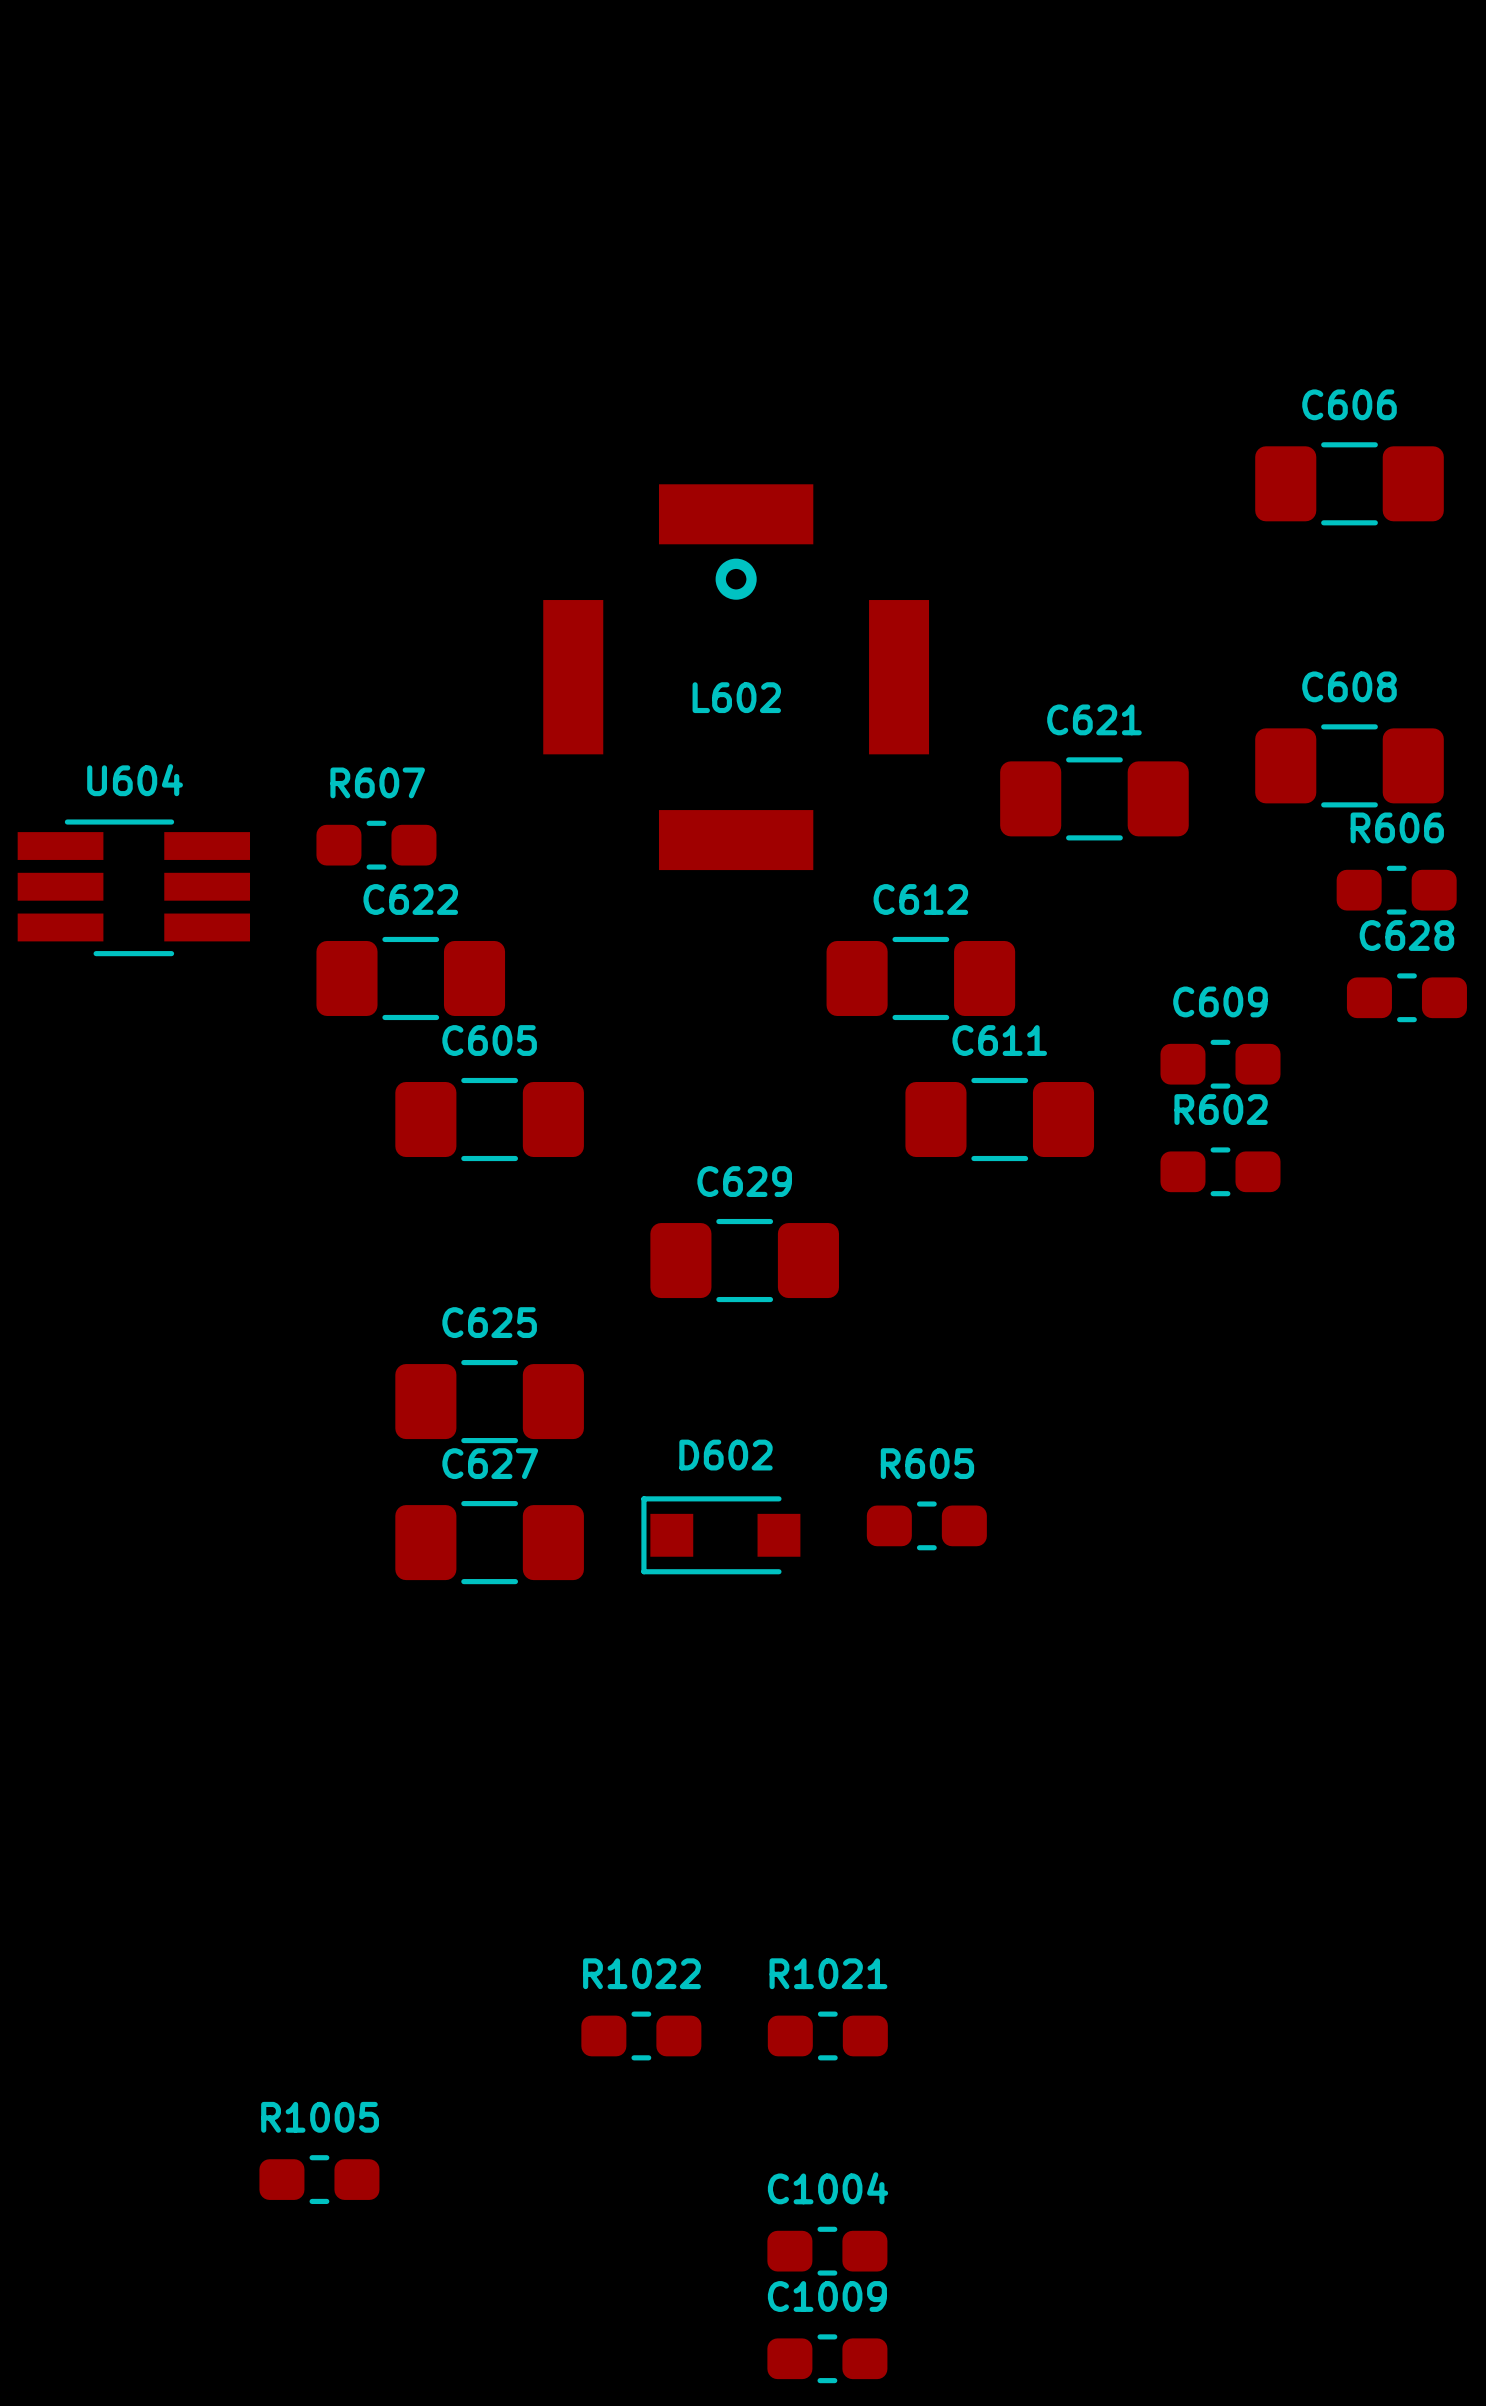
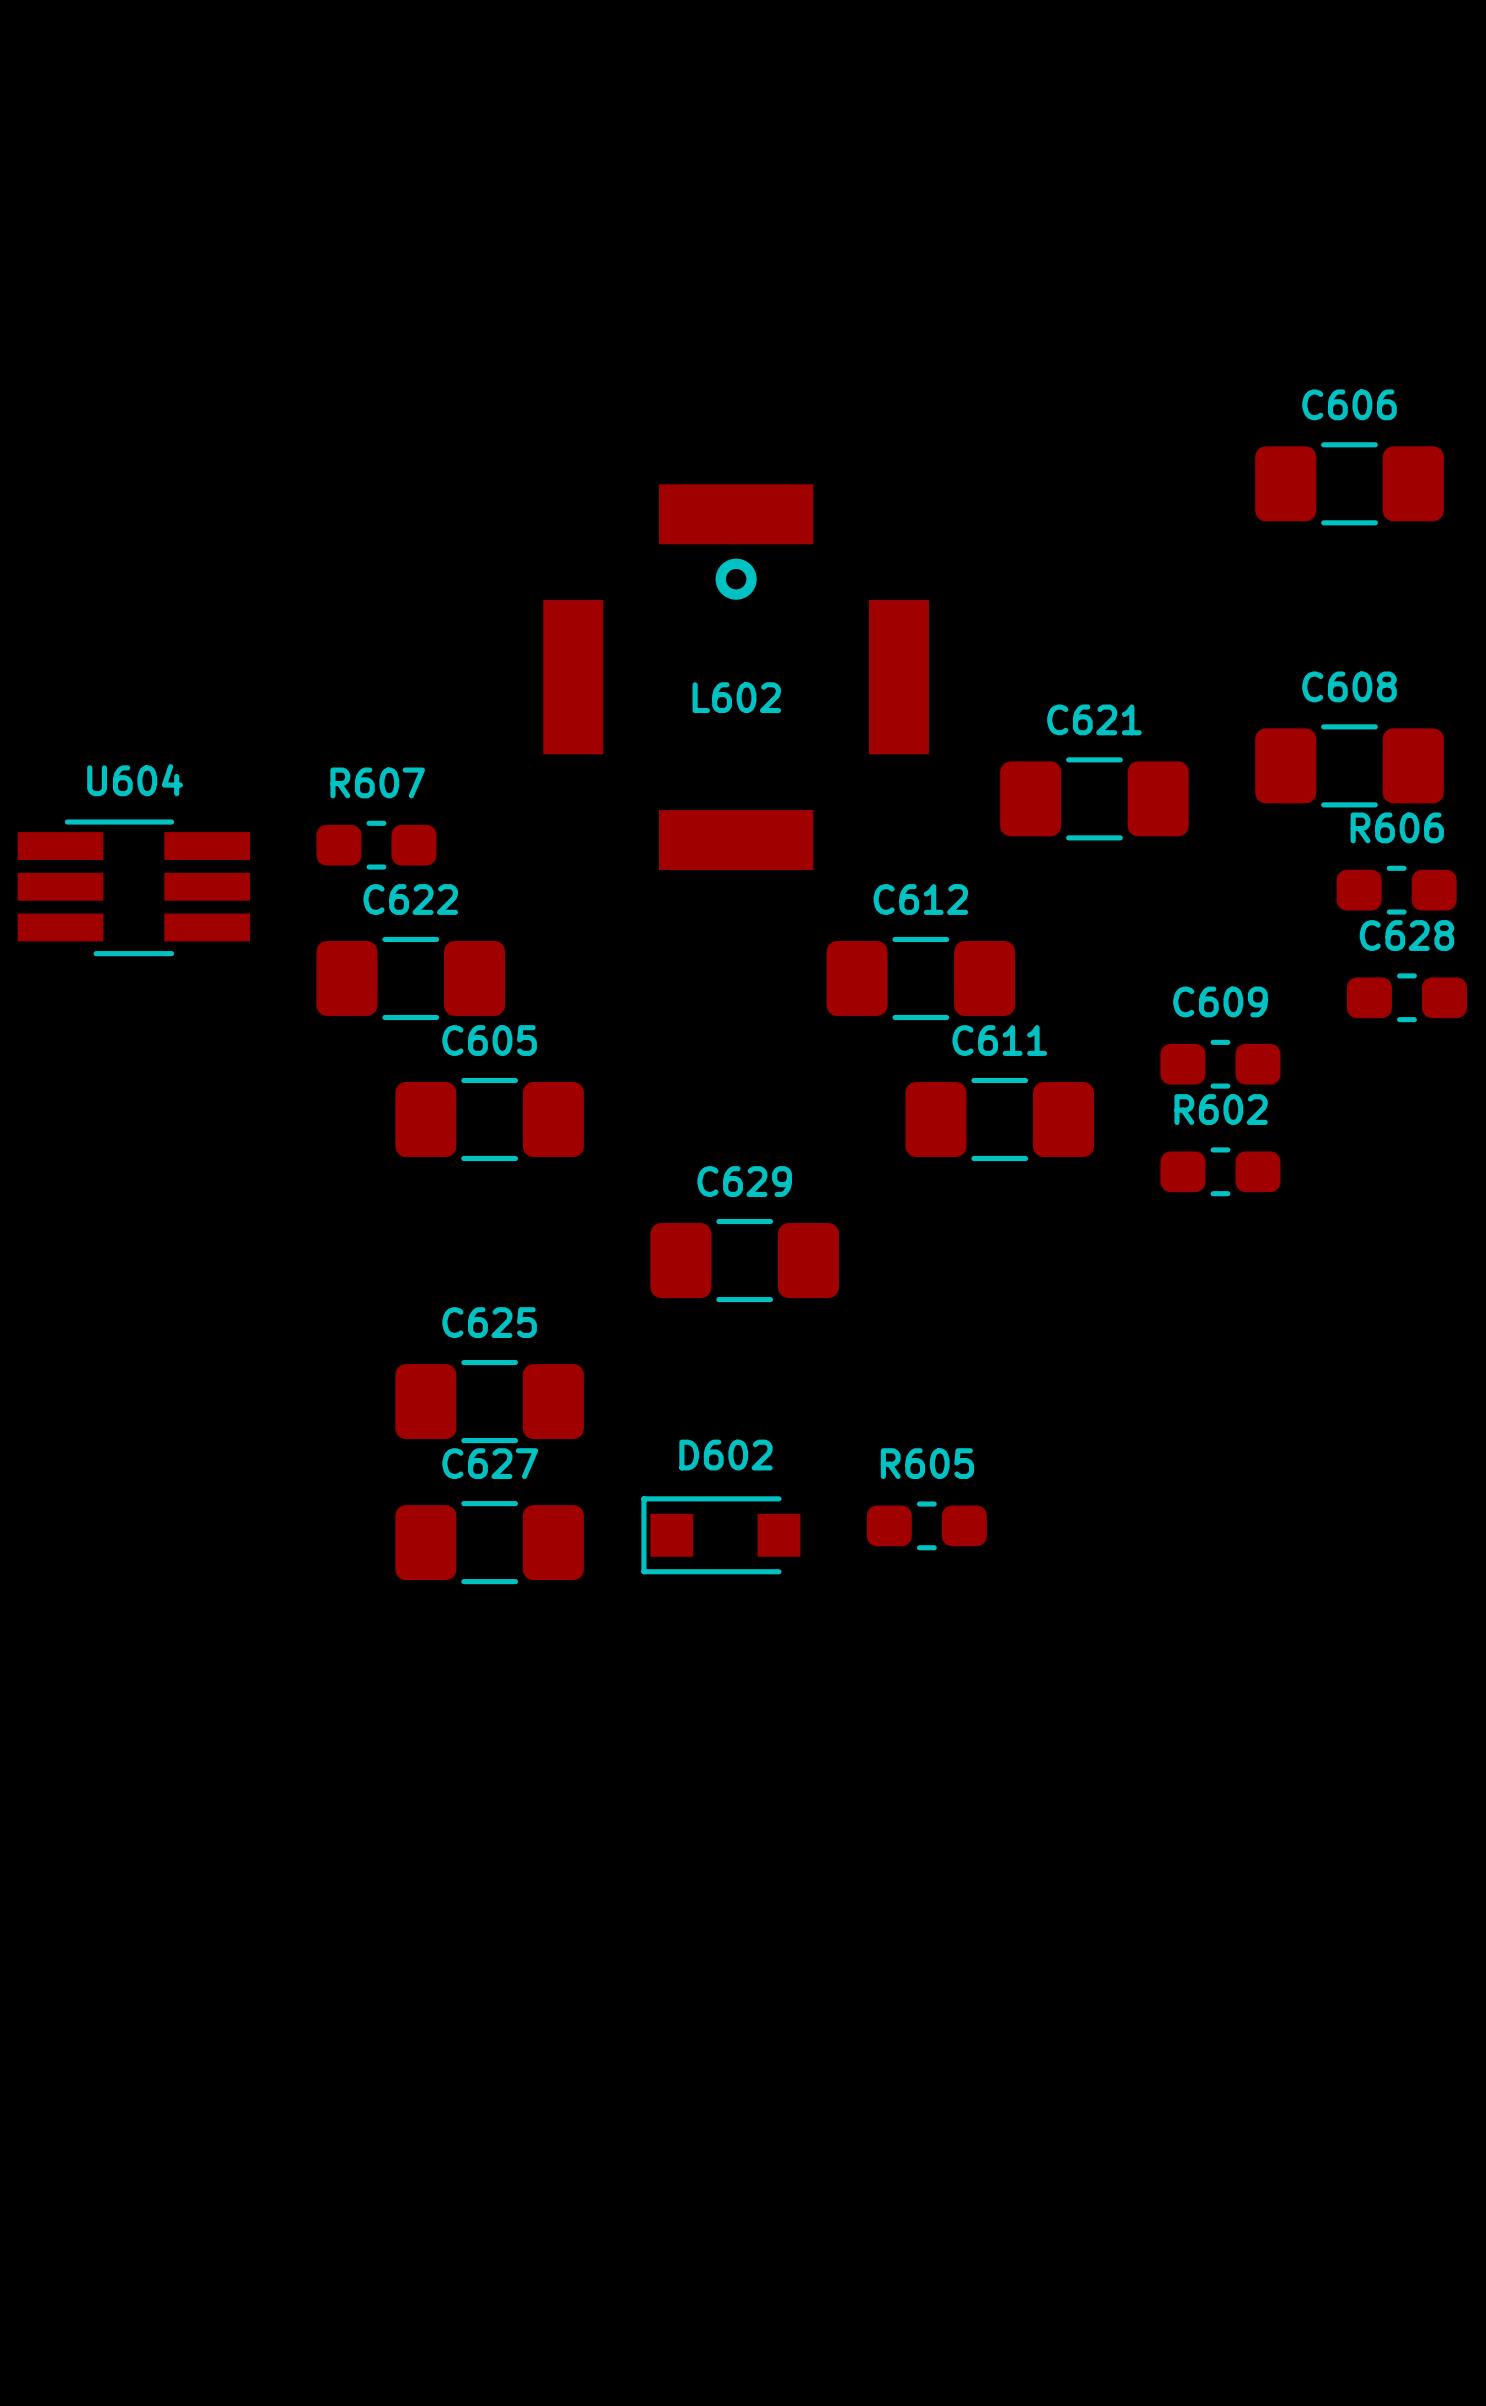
R1022: (641, 2035) -> none
R1021: (827, 2035) -> none
R1005: (319, 2179) -> none
C1004: (827, 2251) -> none
C1009: (827, 2358) -> none

